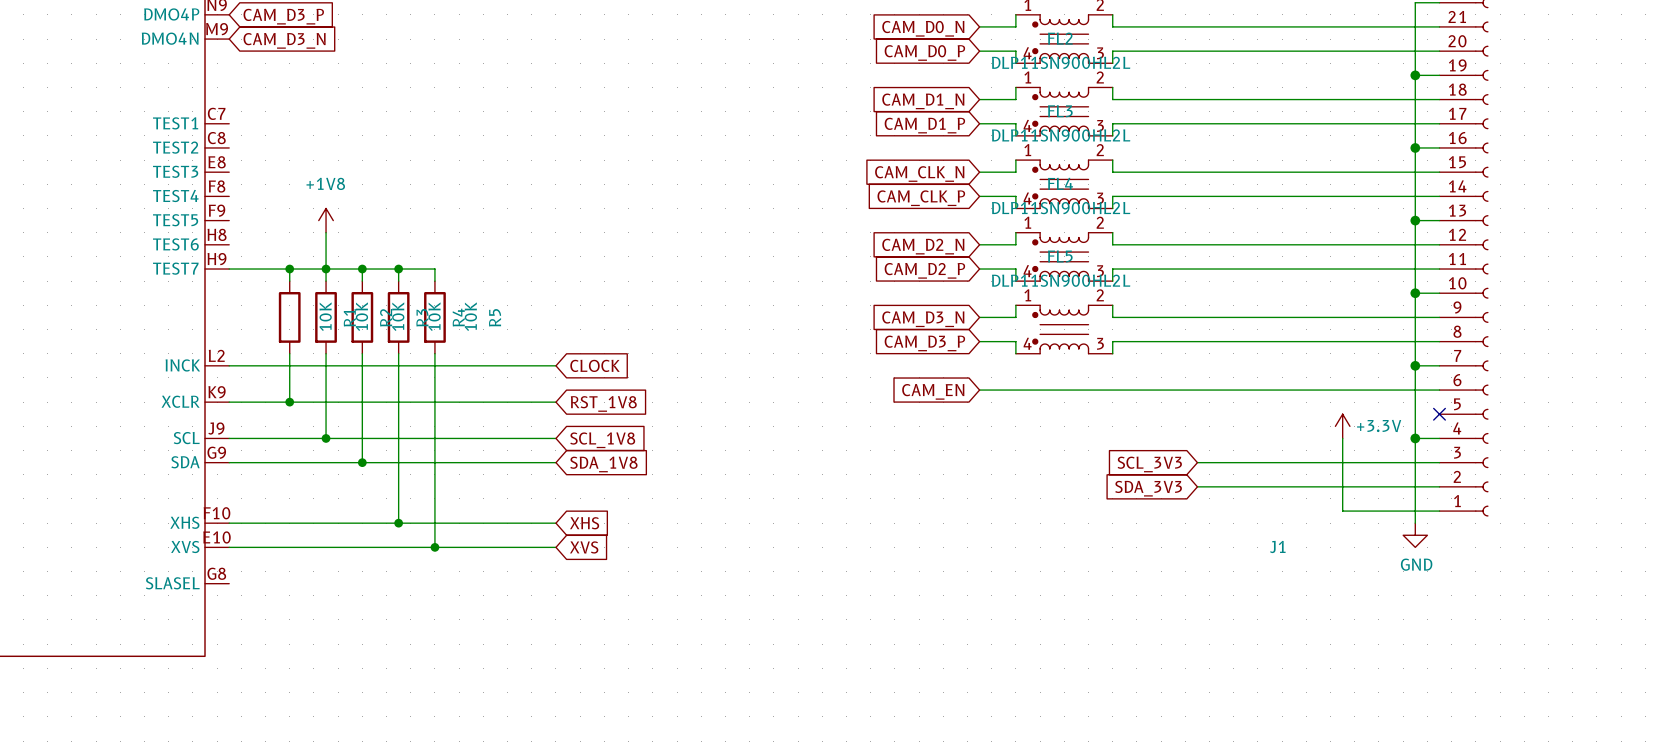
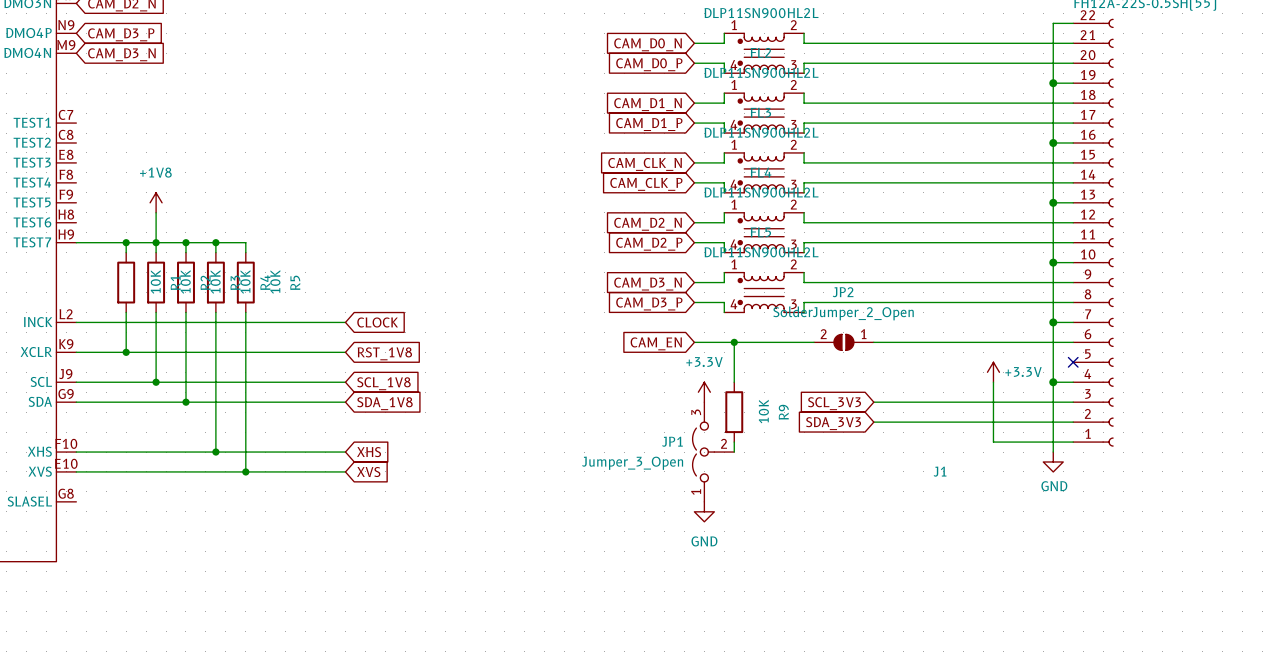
wire: none -> (734, 342) (734, 382)
junction: none -> (734, 342)
JP2: none -> SolderJumper_2_Open (843, 342)
power symbol: none -> +3.3V (704, 392)
R9: none -> 10K (734, 412)
wire: none -> (734, 442) (734, 452)
JP1: none -> Jumper_3_Open (713, 452)
power symbol: none -> GND (704, 511)

